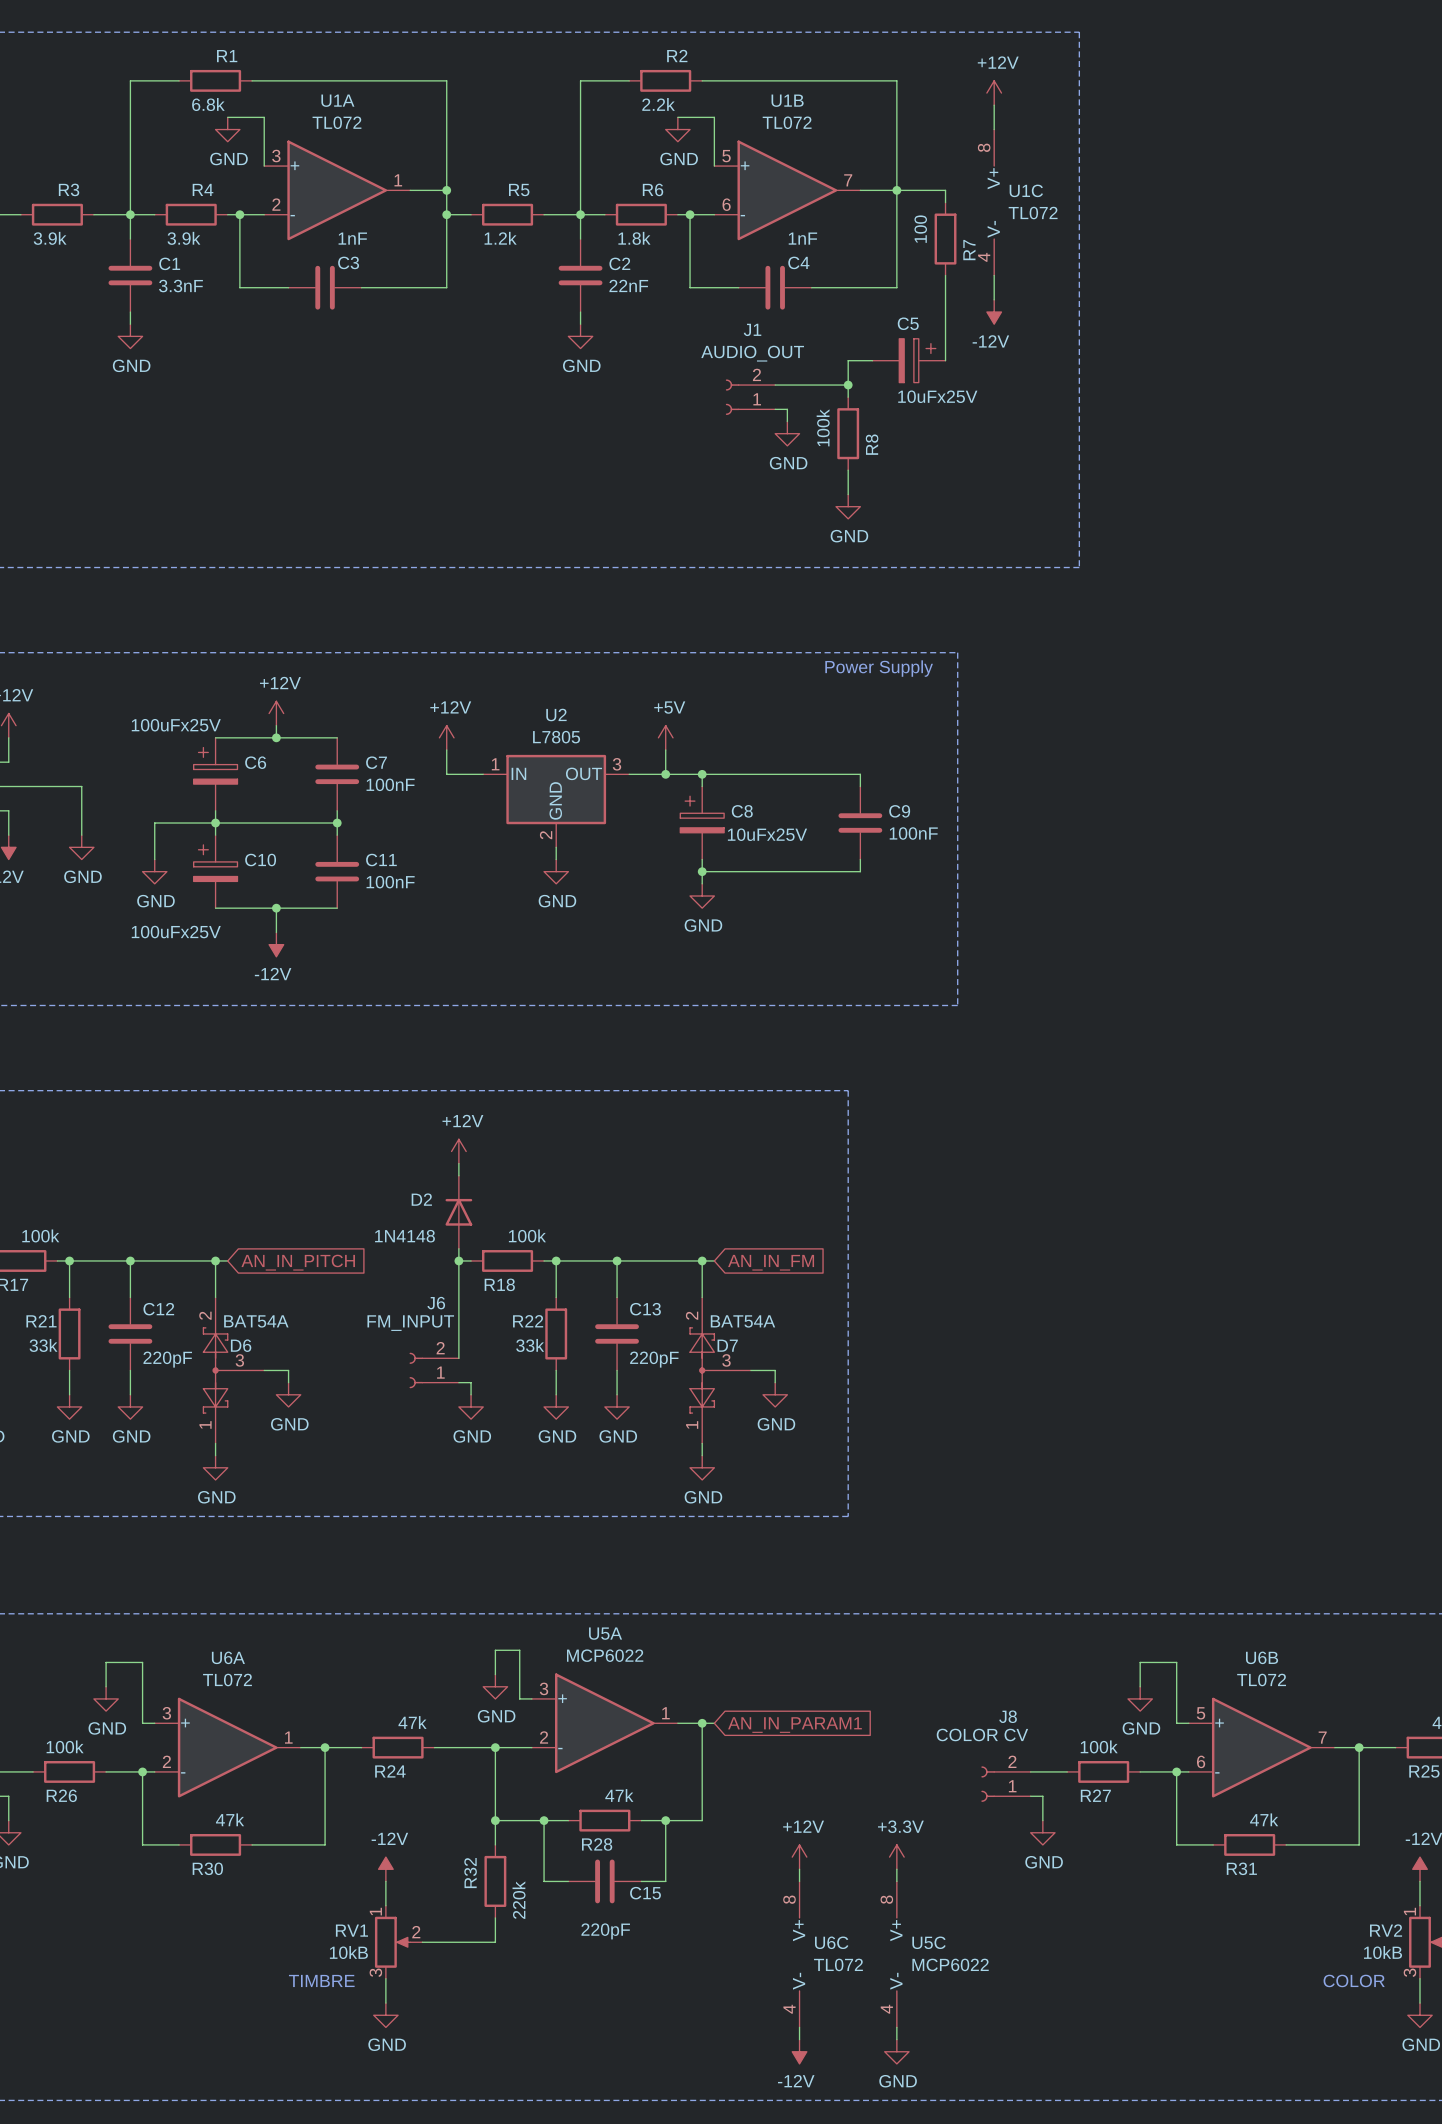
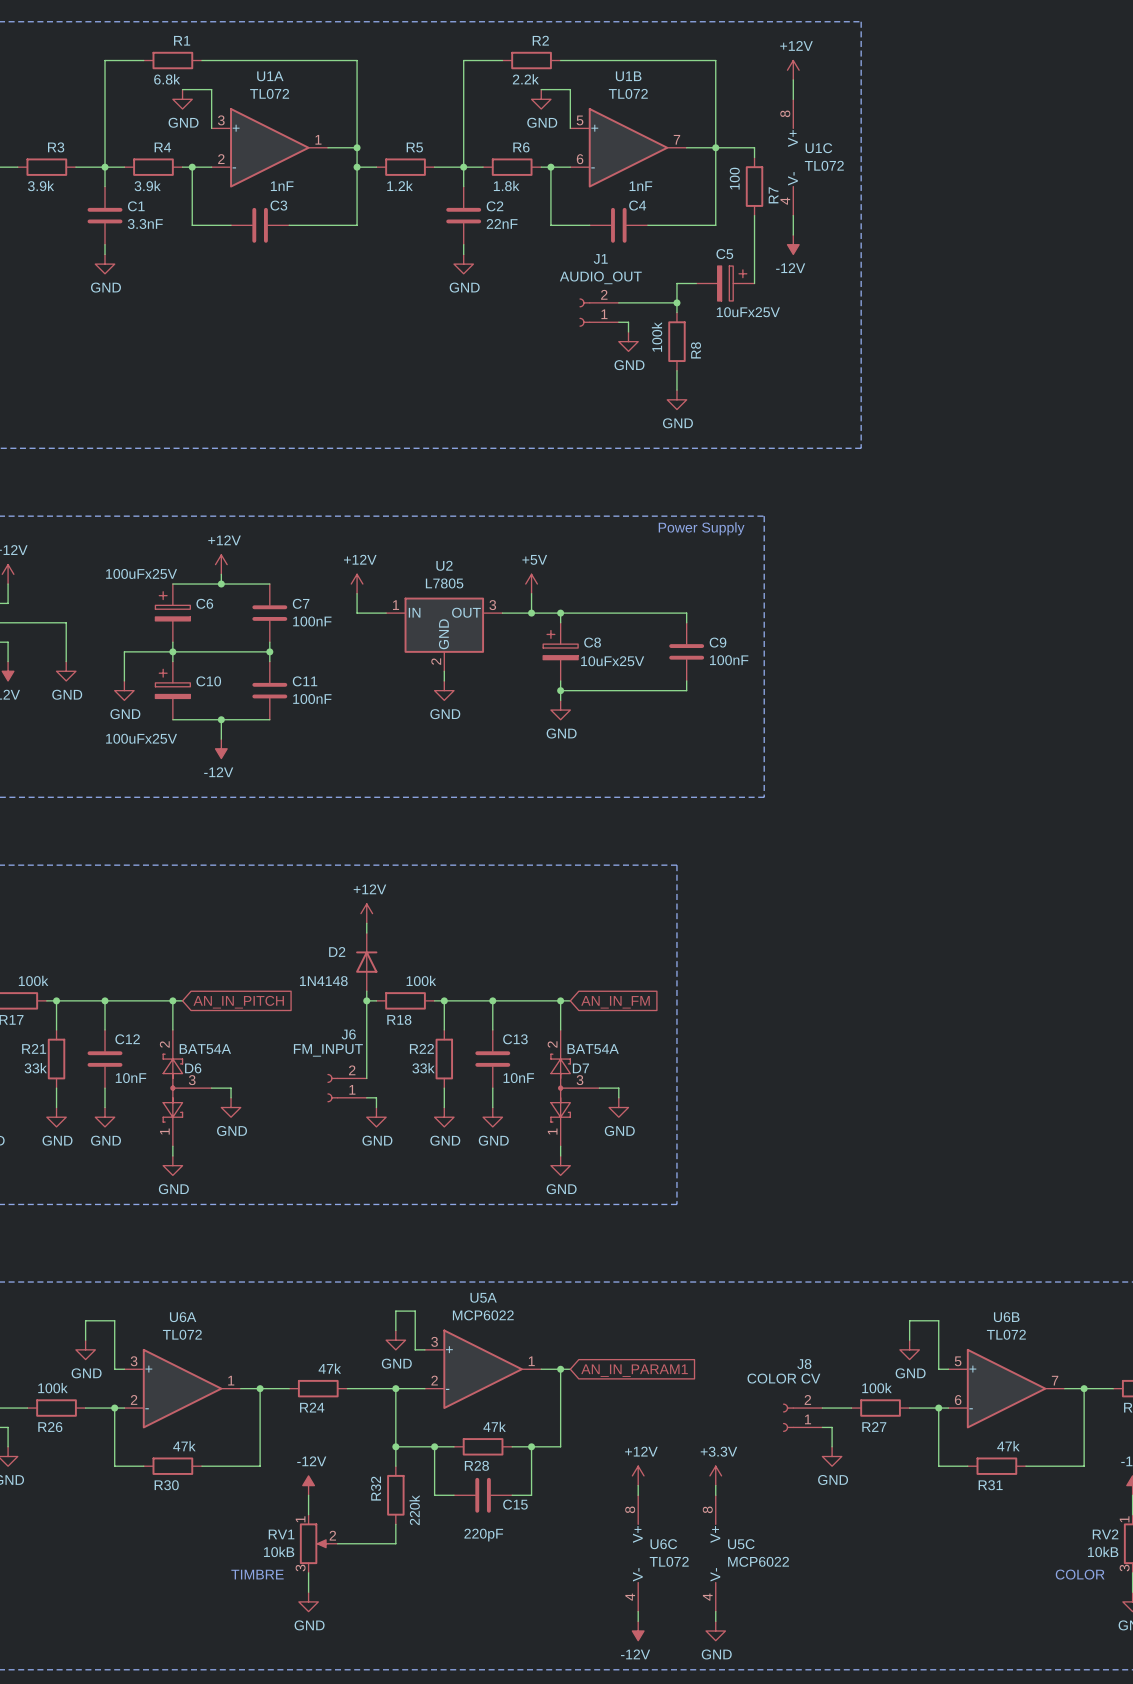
C12 value: 220pF (167, 1359) -> 10nF (131, 1078)
C13 value: 220pF (654, 1359) -> 10nF (518, 1078)

